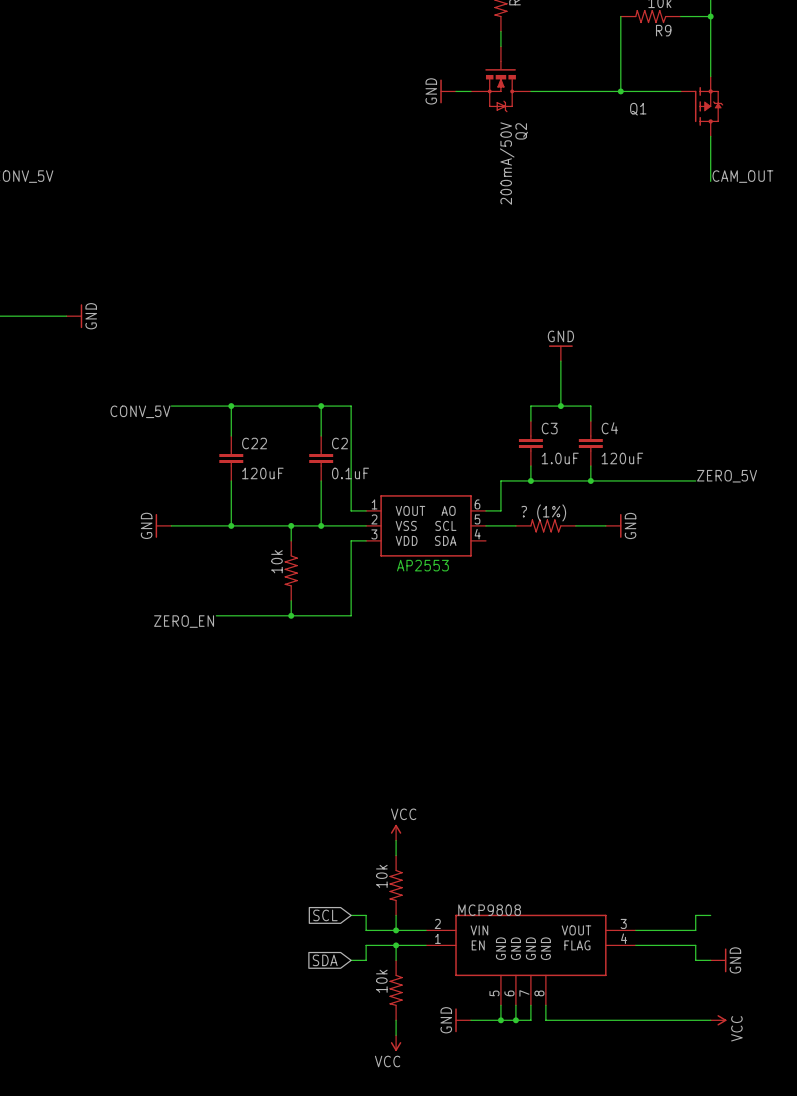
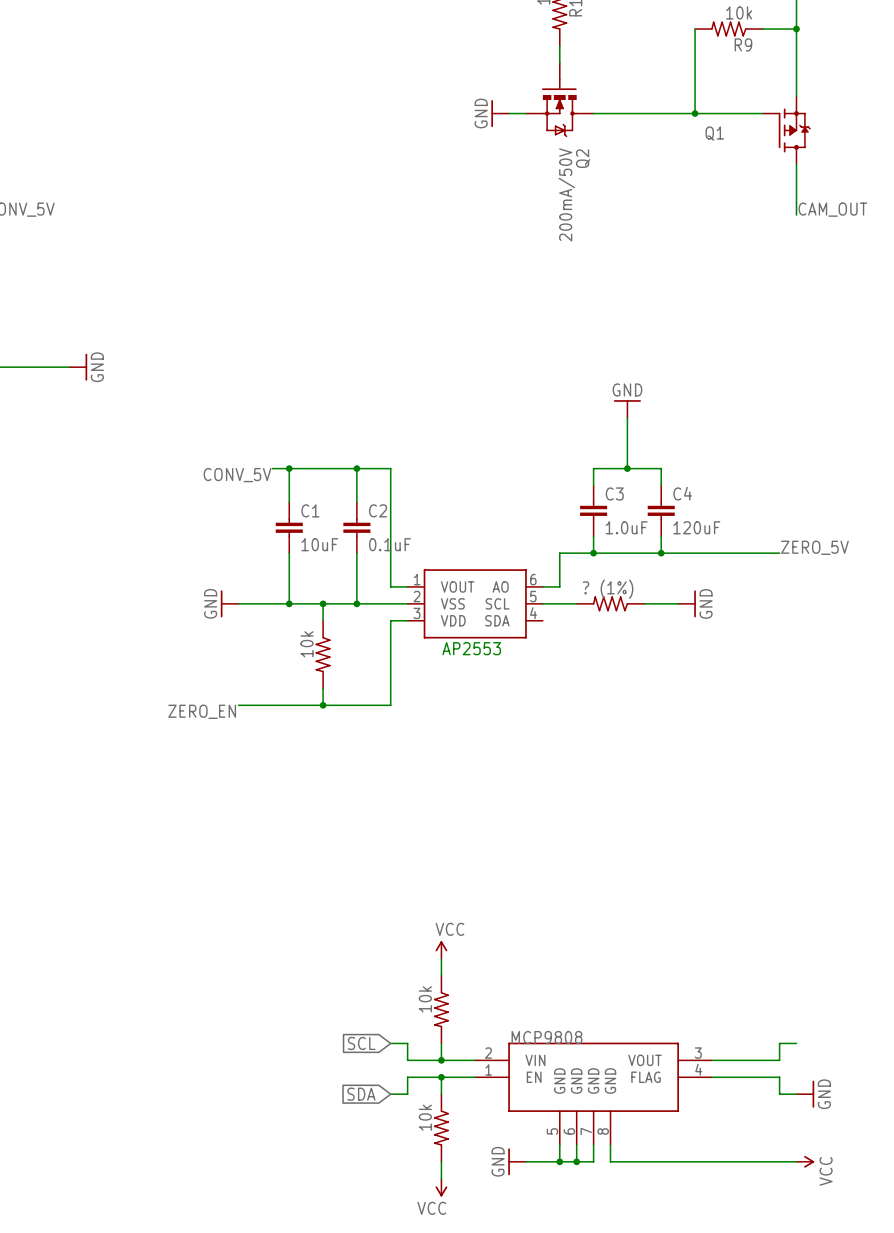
wire: (171, 406) (246, 406) -> none
wire: (231, 406) (231, 436) -> (289, 468) (289, 502)
junction position: (231, 406) -> (289, 468)
label position: CONV_5V (140, 411) -> CONV_5V (237, 475)
C22: 120uF (231, 458) -> none
C1: none -> 10uF (289, 527)
wire: (231, 480) (231, 525) -> (289, 553) (289, 603)
power symbol position: GND (163, 525) -> GND (229, 603)
wire: (171, 525) (216, 525) -> none
junction position: (231, 525) -> (289, 603)

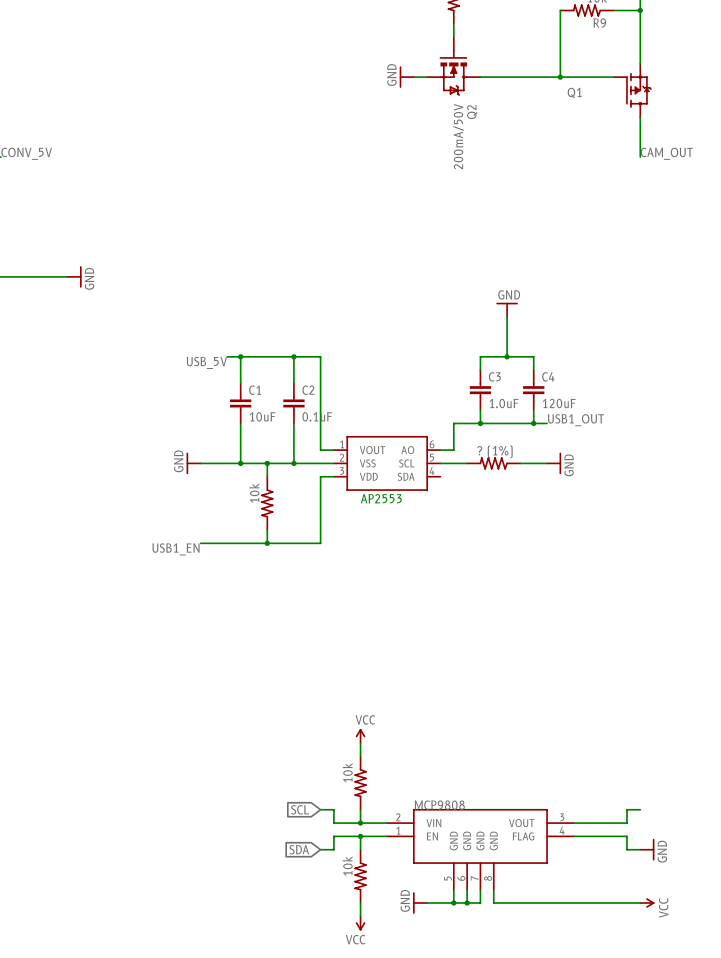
label: CONV_5V (237, 475) -> USB_5V (206, 362)
label: none -> USB1_OUT (575, 420)
label: ZERO_5V (814, 547) -> none
wire: (678, 553) (779, 553) -> none
label: ZERO_EN (202, 711) -> USB1_EN (175, 549)

